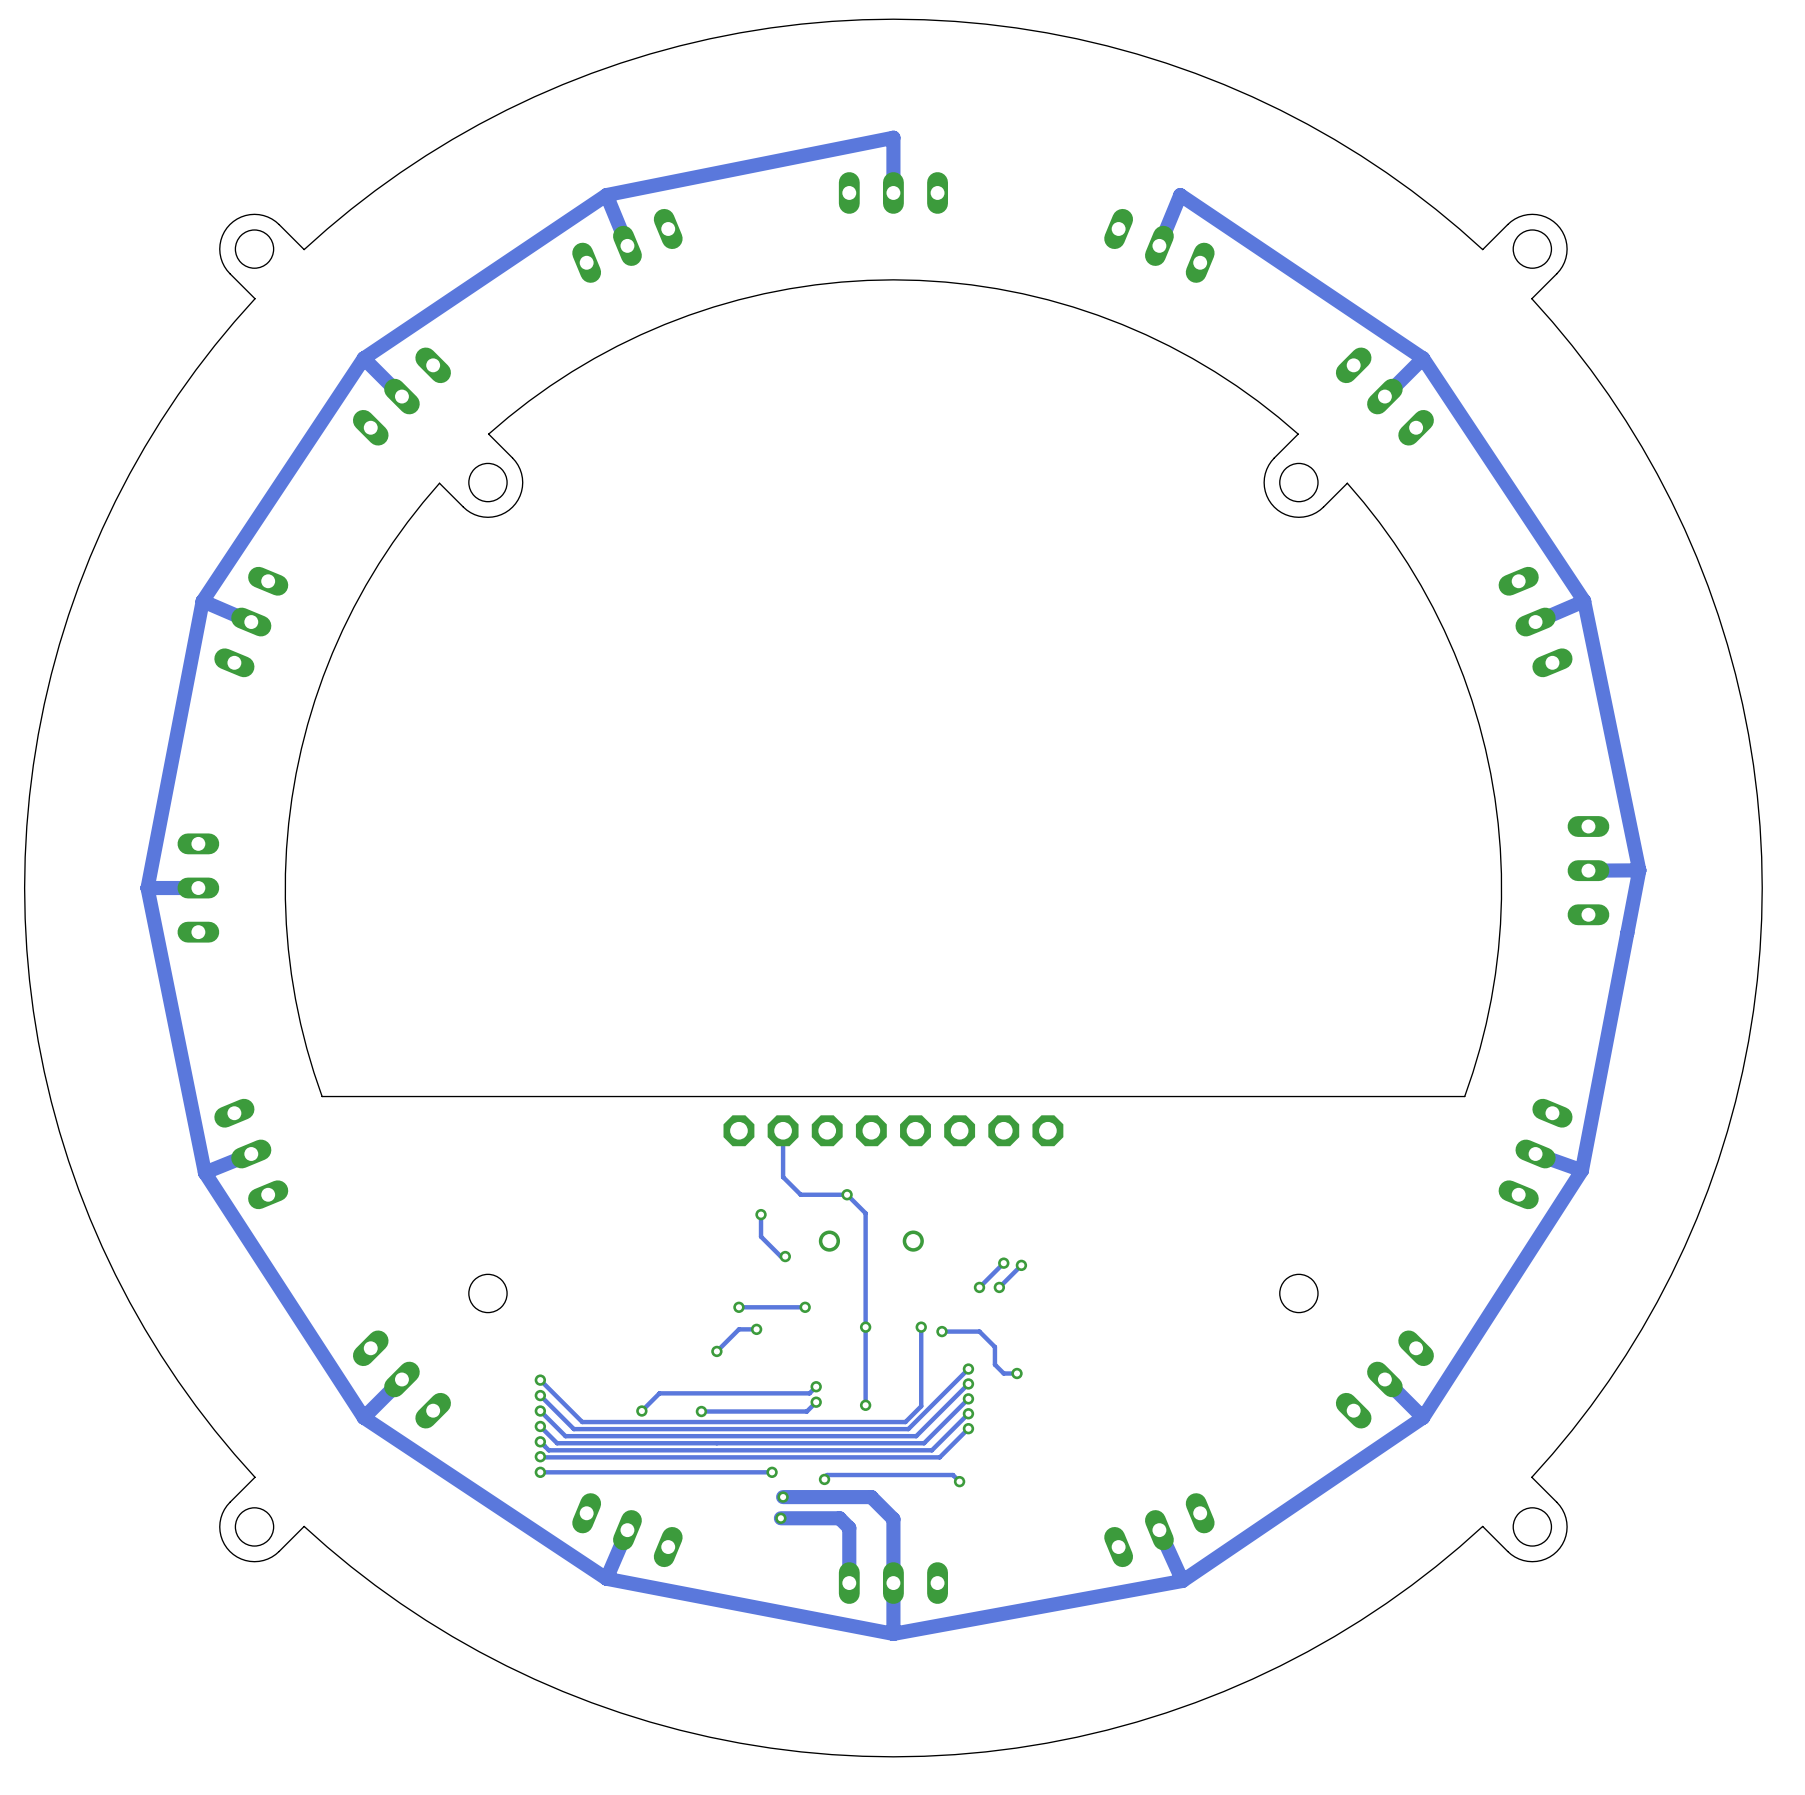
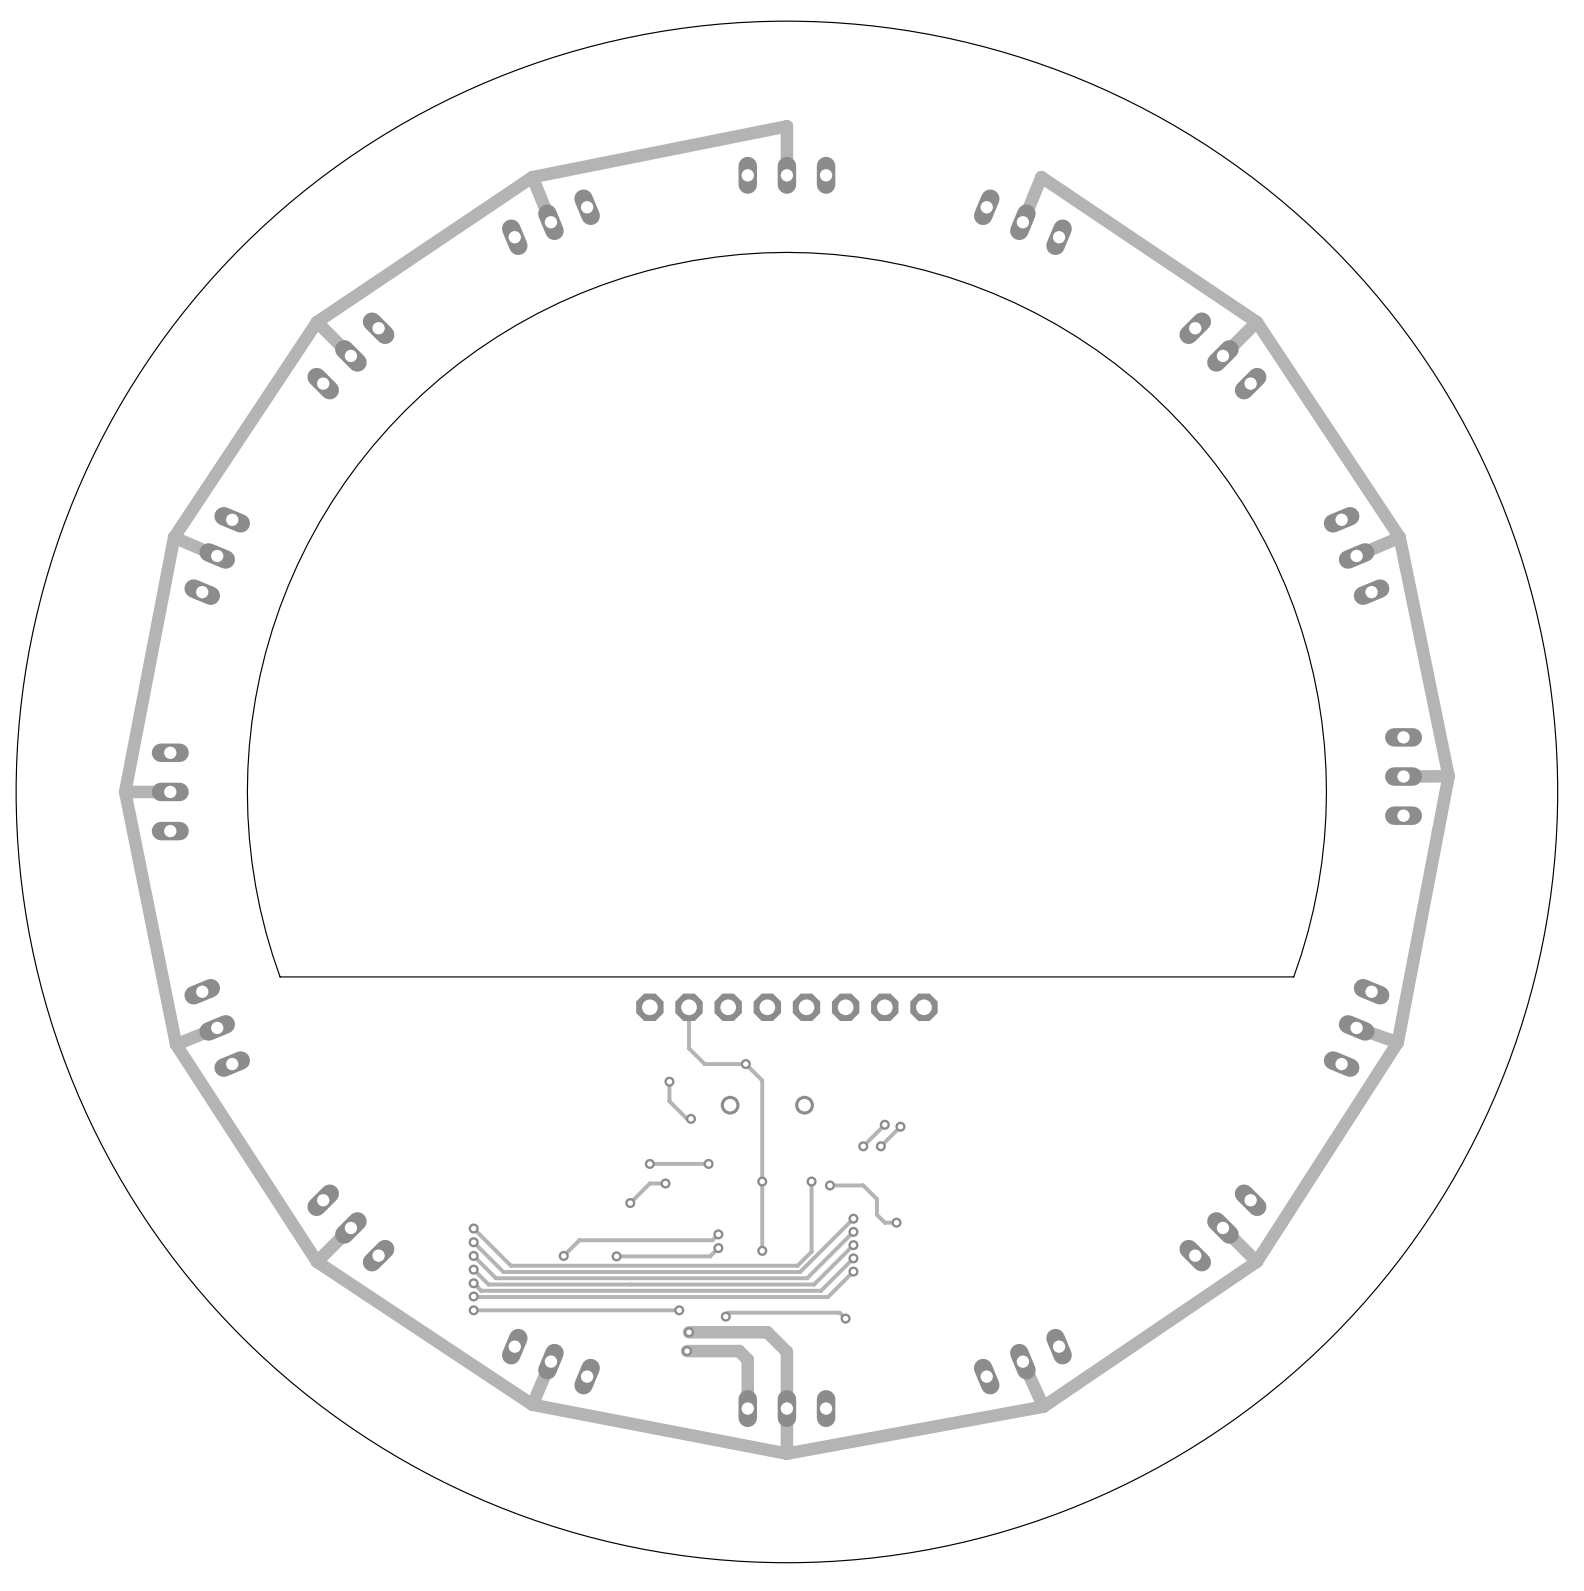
round board edge: none -> [16, 21, 1558, 1563]
board edge: (1507, 224) (1482, 249) (1411, 190) (1334, 139) (1252, 96) (1166, 63) (1107, 45) (1016, 27) (955, 21) (893, 19) (831, 21) (740, 32) (679, 45) (591, 73) (534, 96) (452, 139) (375, 190) (304, 249) (275, 221) (263, 215) (245, 215) (229, 224) (220, 240) (220, 258) (226, 270) (255, 298) (195, 369) (144, 446) (102, 529) (78, 586) (51, 674) (38, 734) (26, 826) (24, 888) (26, 949) (38, 1041) (51, 1101) (78, 1189) (102, 1246) (144, 1329) (195, 1406) (255, 1477) (226, 1505) (220, 1517) (220, 1535) (229, 1551) (245, 1560) (263, 1560) (275, 1554) (304, 1526) (375, 1585) (452, 1636) (534, 1679) (591, 1702) (679, 1730) (740, 1743) (831, 1754) (893, 1756) (955, 1754) (1046, 1743) (1107, 1730) (1195, 1702) (1252, 1679) (1334, 1636) (1411, 1585) (1482, 1526) (1511, 1554) (1523, 1560) (1541, 1560) (1556, 1551) (1565, 1535) (1565, 1517) (1559, 1505) (1531, 1477) (1590, 1406) (1641, 1329) (1684, 1246) (1708, 1189) (1735, 1101) (1753, 1010) (1760, 949) (1761, 857) (1753, 765) (1742, 704) (1718, 615) (1696, 557) (1671, 501) (1625, 420) (1590, 369) (1531, 298) (1556, 273) (1564, 262) (1567, 249) (1562, 231) (1553, 221) (1536, 214) (1523, 215) (1507, 224) -> none
round board edge: [235, 229, 274, 269] -> none
round board edge: [1513, 229, 1552, 269] -> none
round board edge: [468, 463, 508, 502] -> none
round board edge: [1279, 463, 1319, 502] -> none
board edge: (1464, 1096) (1486, 1024) (1498, 949) (1501, 873) (1494, 798) (1479, 724) (1454, 653) (1420, 585) (1394, 542) (1347, 483) (1323, 507) (1312, 514) (1294, 517) (1277, 510) (1271, 503) (1265, 491) (1265, 473) (1271, 461) (1298, 434) (1236, 385) (1169, 346) (1097, 315) (1022, 293) (971, 284) (893, 279) (815, 284) (764, 293) (689, 315) (617, 346) (550, 385) (488, 434) (515, 461) (521, 473) (521, 491) (515, 503) (509, 510) (492, 517) (474, 514) (463, 507) (439, 483) (392, 542) (365, 585) (332, 653) (307, 724) (291, 798) (285, 873) (288, 949) (300, 1024) (322, 1096) -> (1293, 976) (1313, 909) (1324, 839) (1325, 768) (1321, 721) (1308, 652) (1294, 607) (1265, 543) (1229, 482) (1200, 445) (1151, 394) (1096, 350) (1036, 313) (971, 284) (926, 270) (857, 257) (786, 252) (716, 257) (647, 270) (602, 284) (537, 313) (477, 350) (422, 394) (373, 445) (344, 482) (308, 543) (279, 607) (265, 652) (251, 721) (247, 768) (249, 839) (260, 909) (280, 976)
round board edge: [468, 1274, 508, 1313] -> none
round board edge: [1279, 1274, 1319, 1313] -> none
round board edge: [235, 1507, 274, 1547] -> none
round board edge: [1513, 1507, 1552, 1547] -> none

